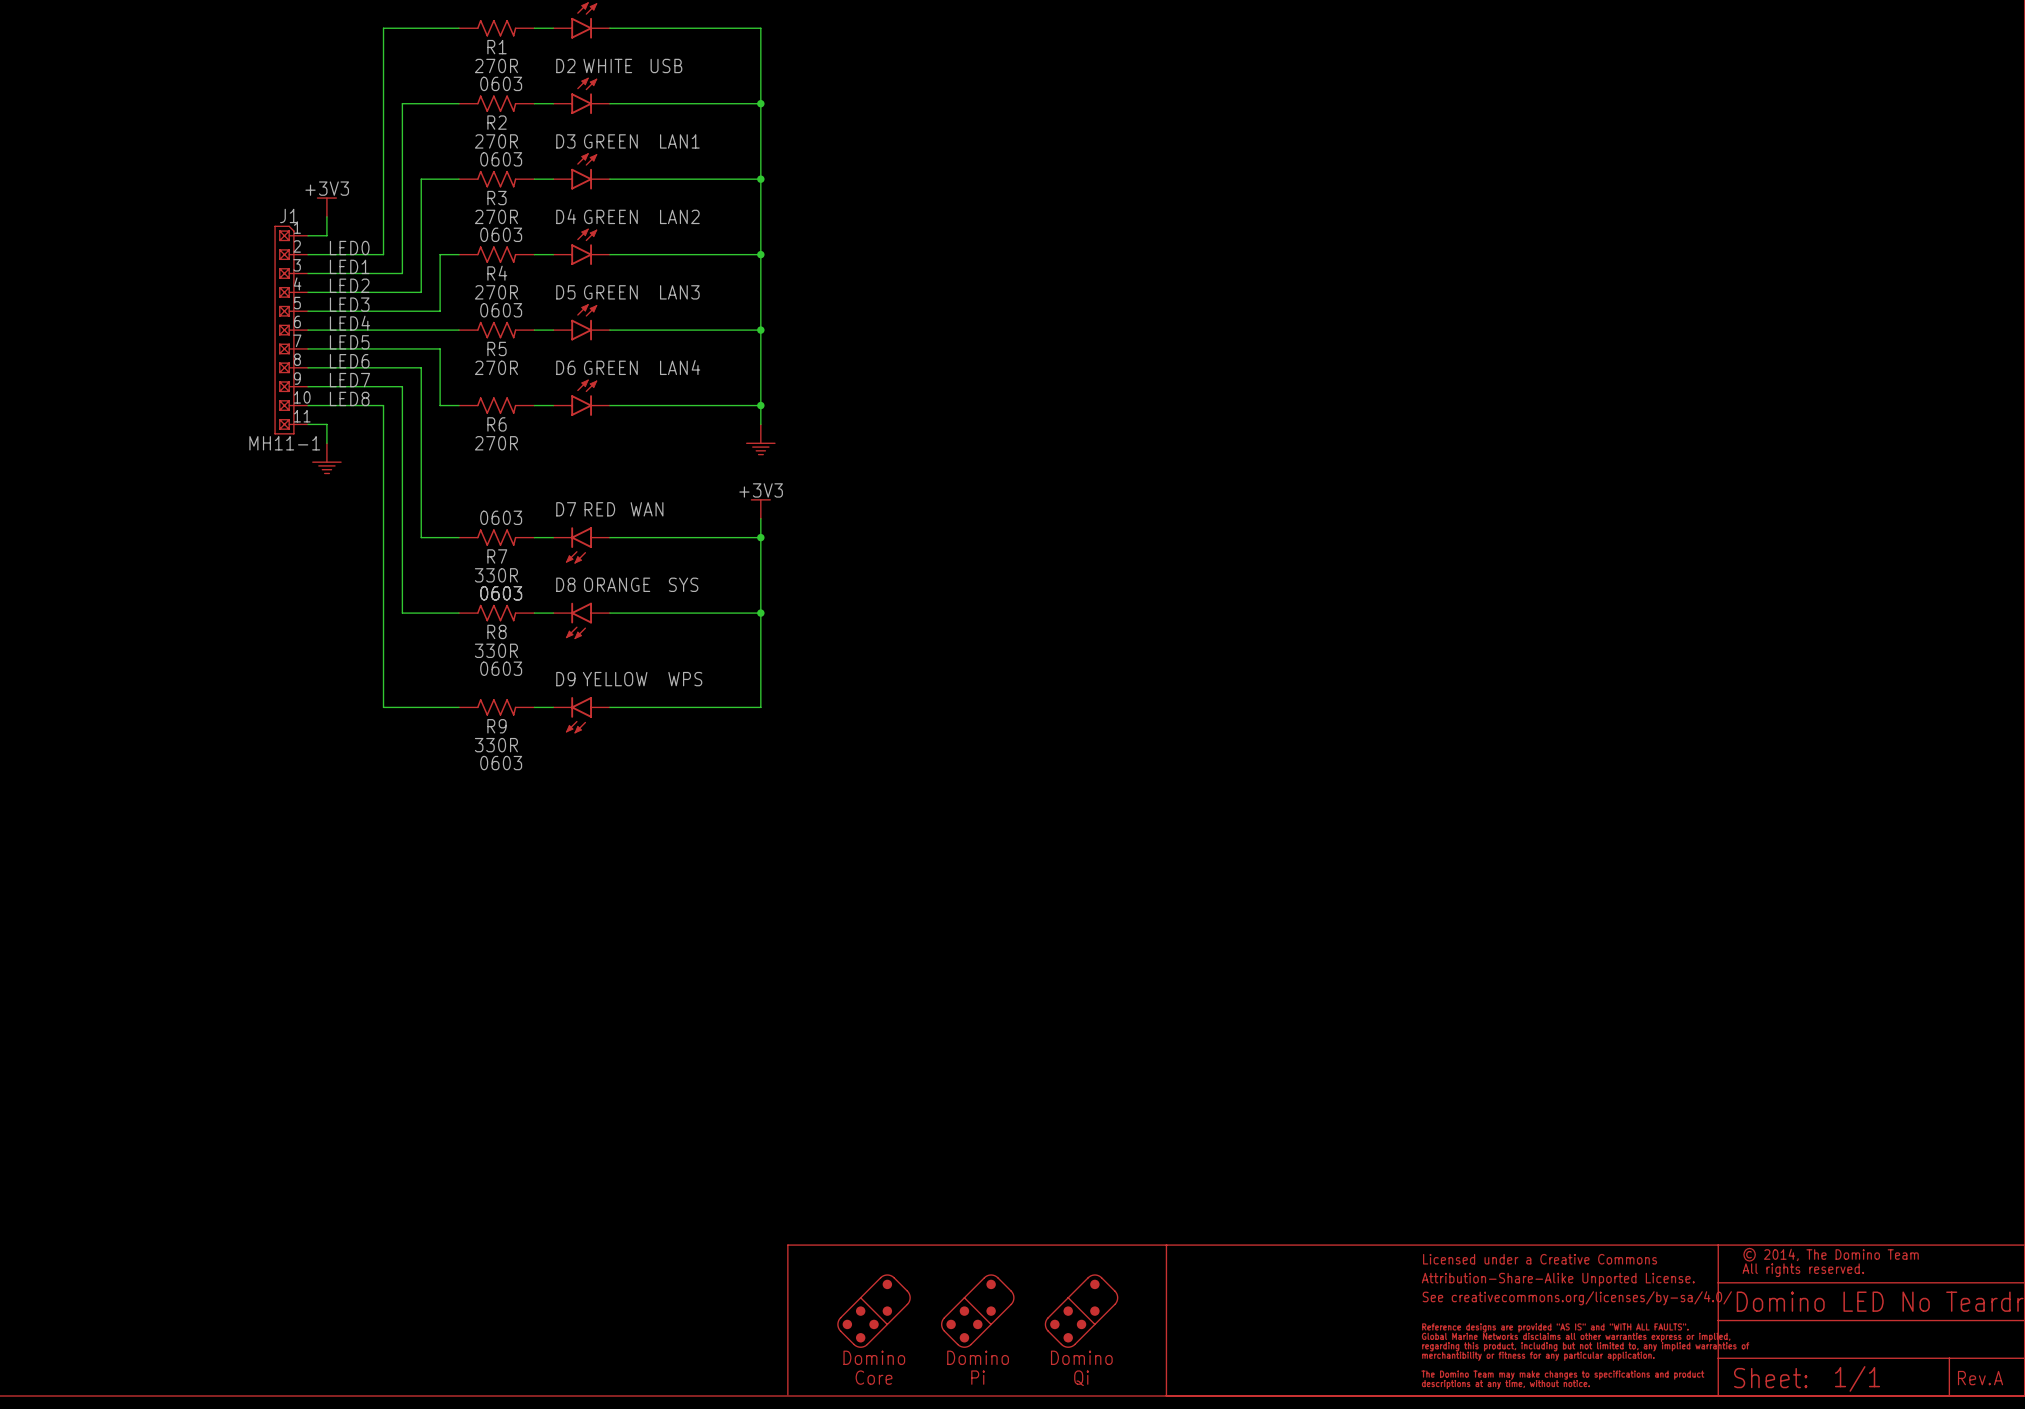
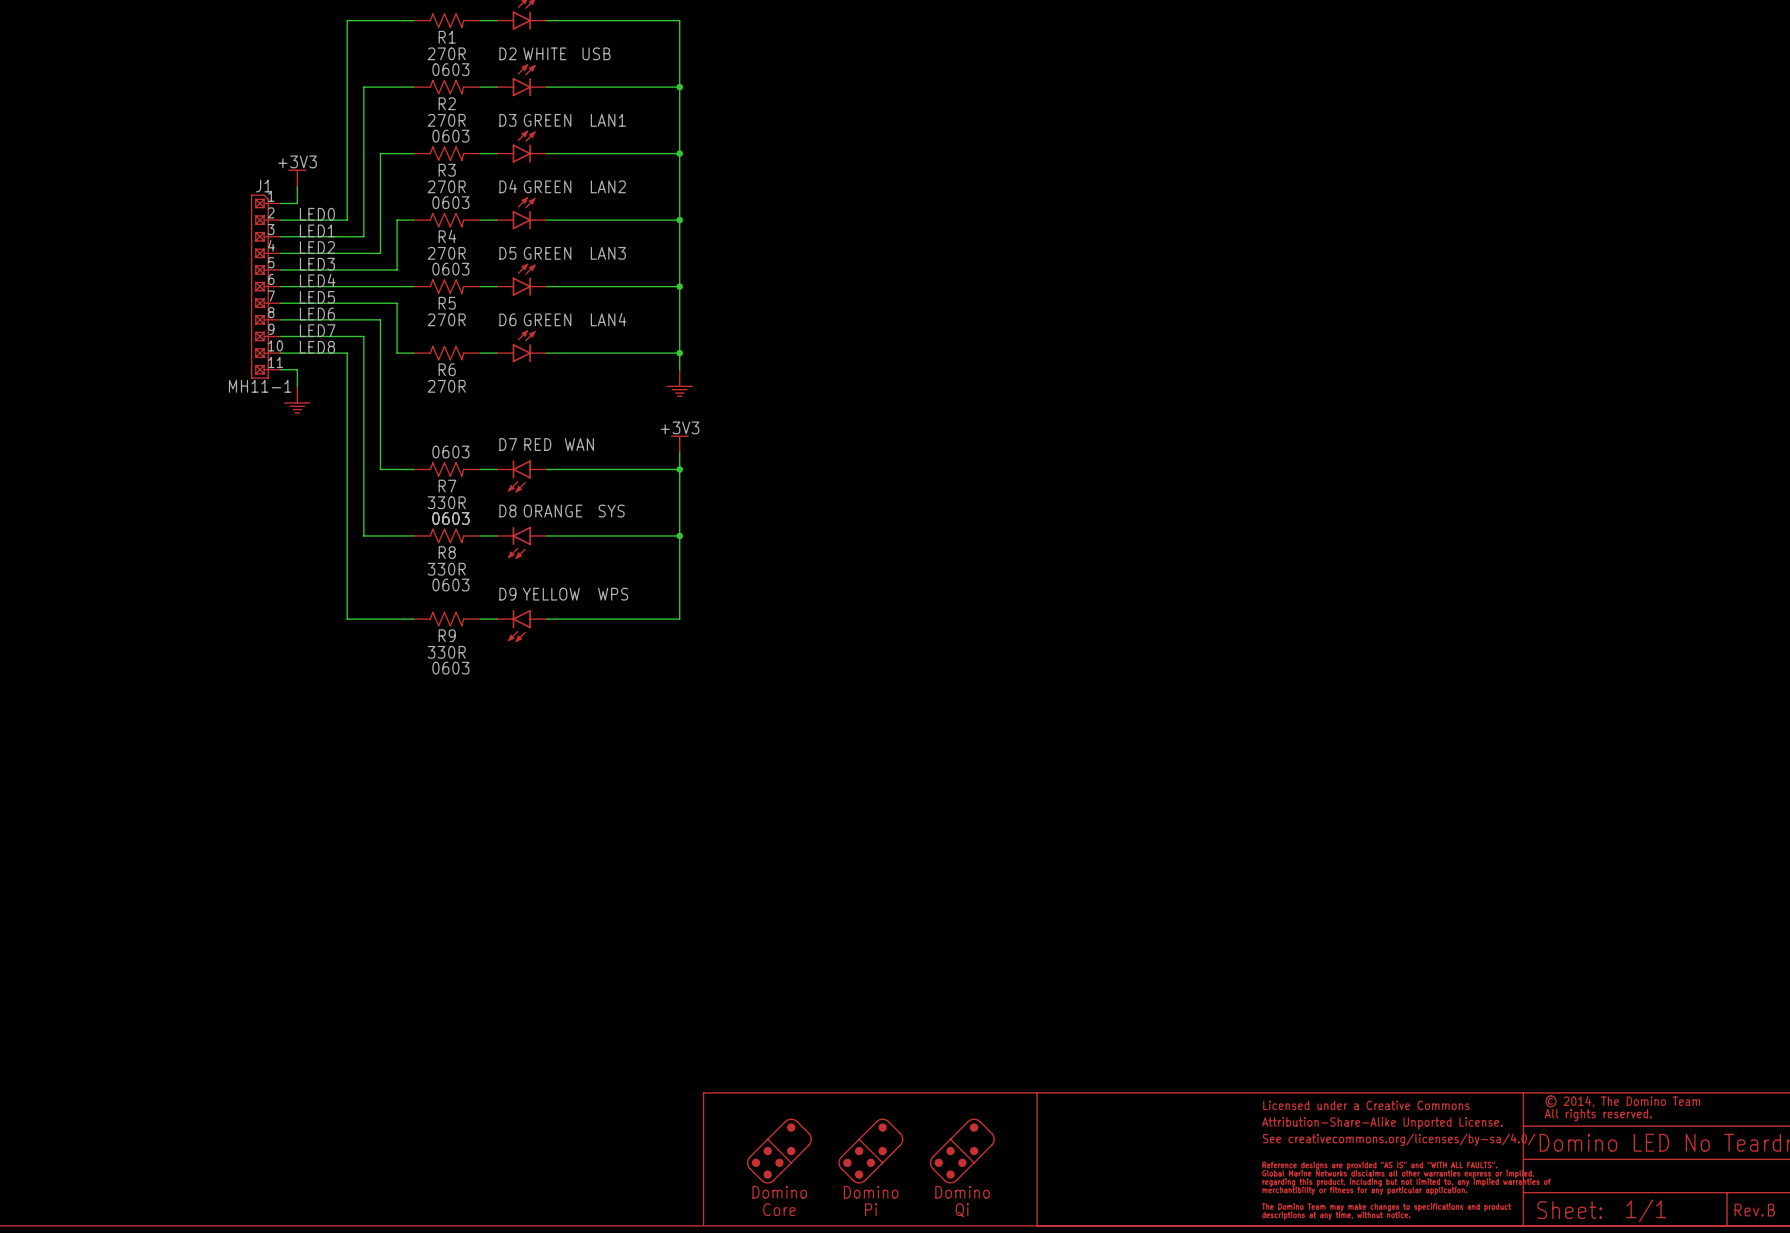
text: A (1998, 1378) -> B (1771, 1210)

